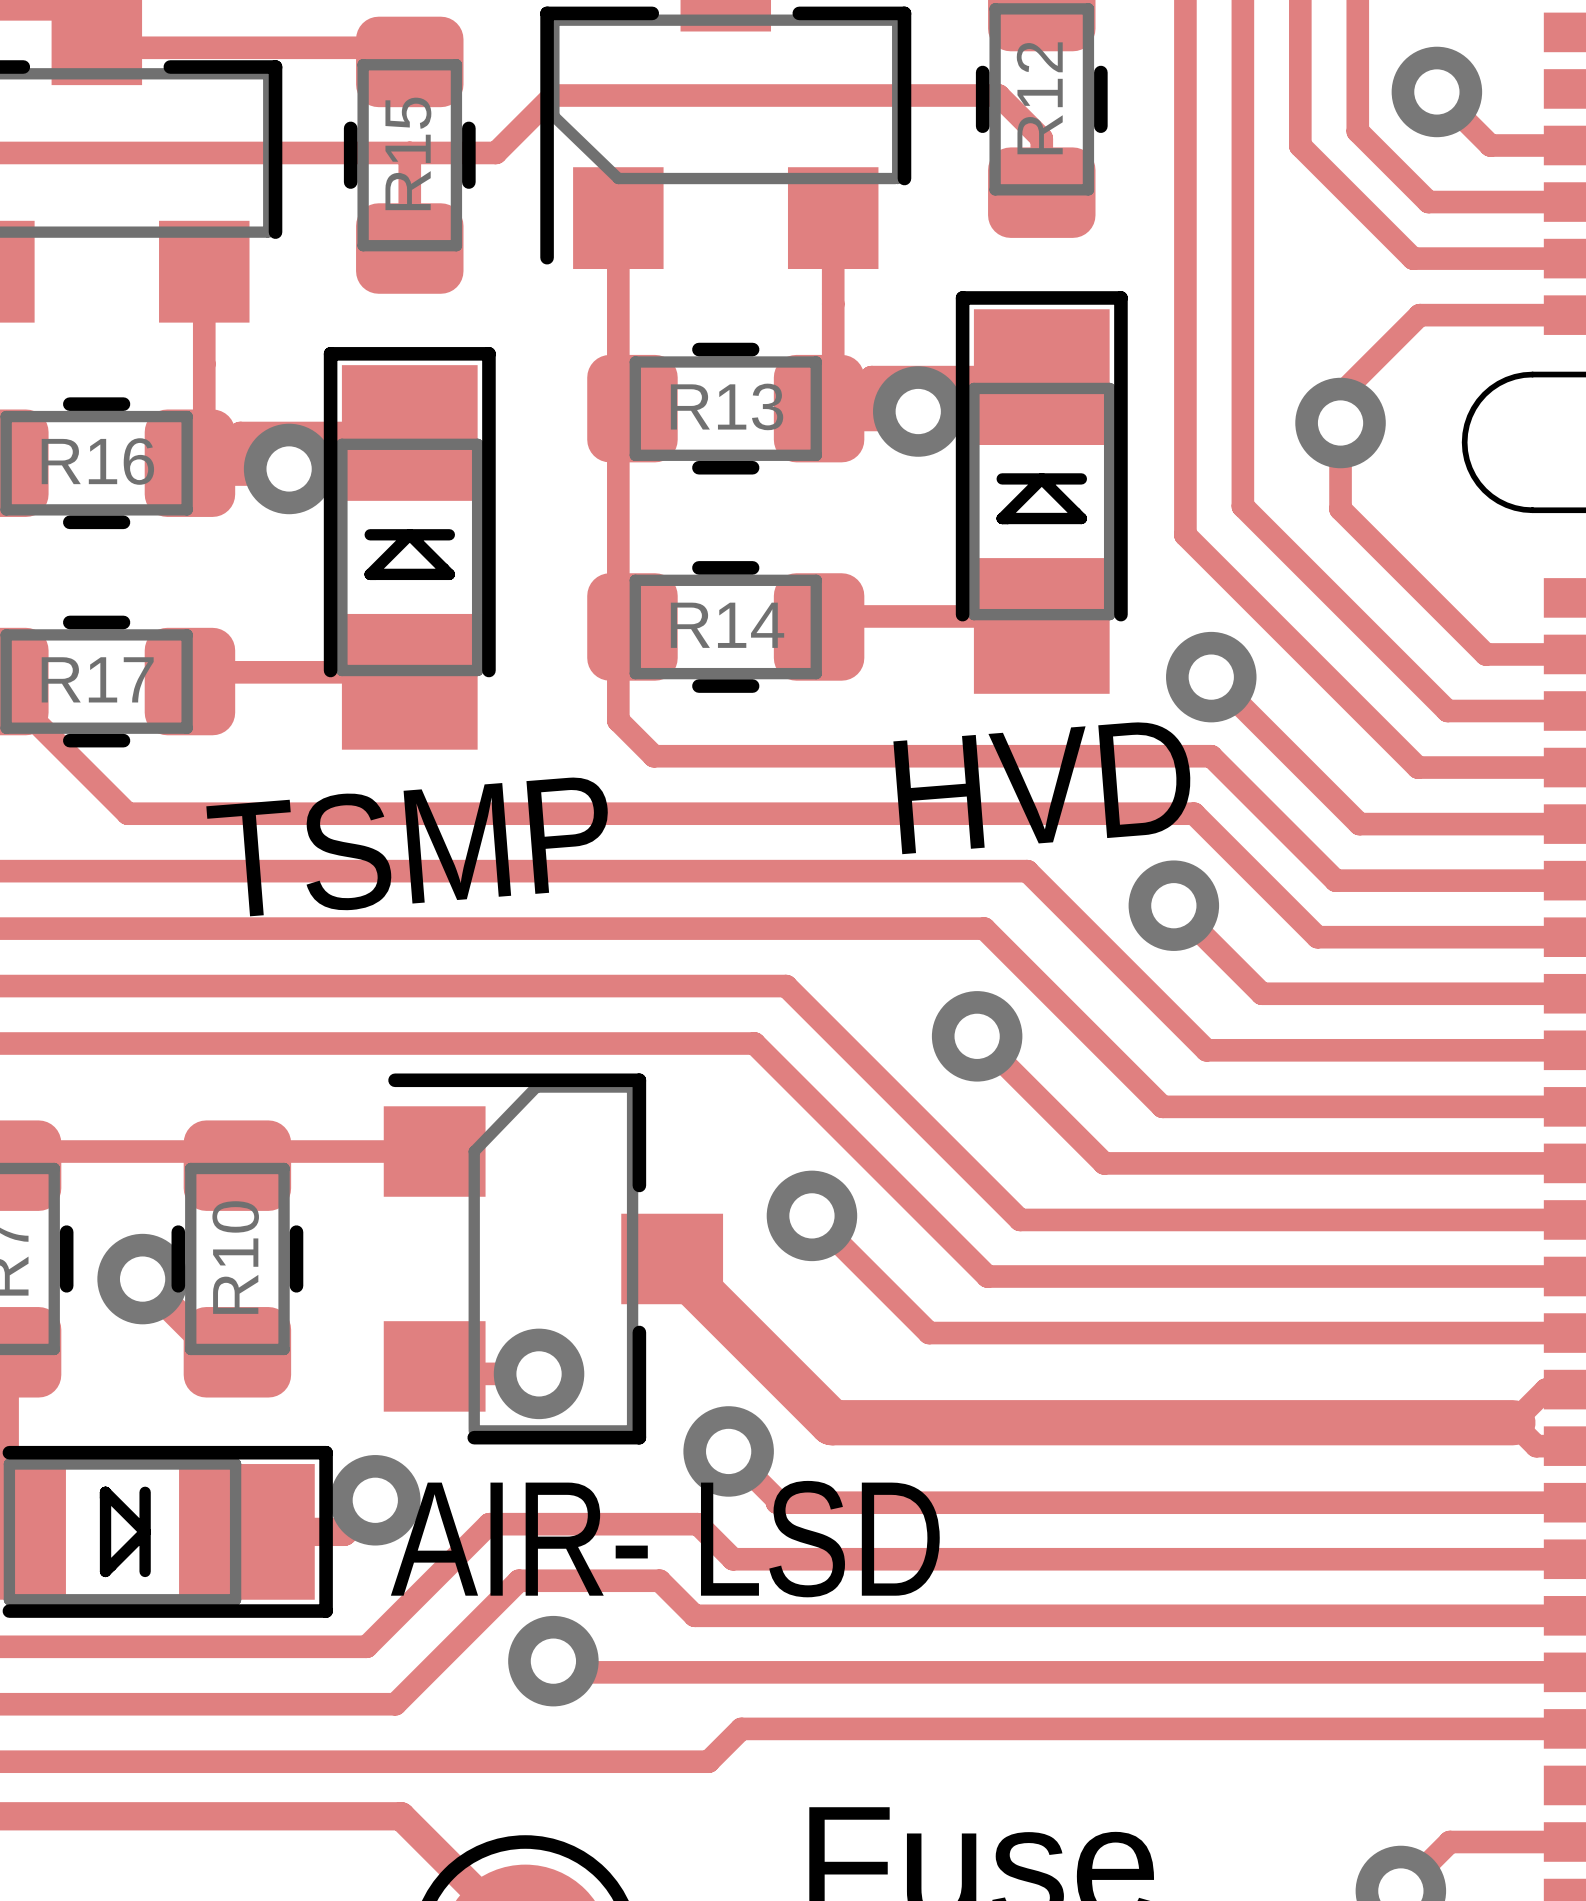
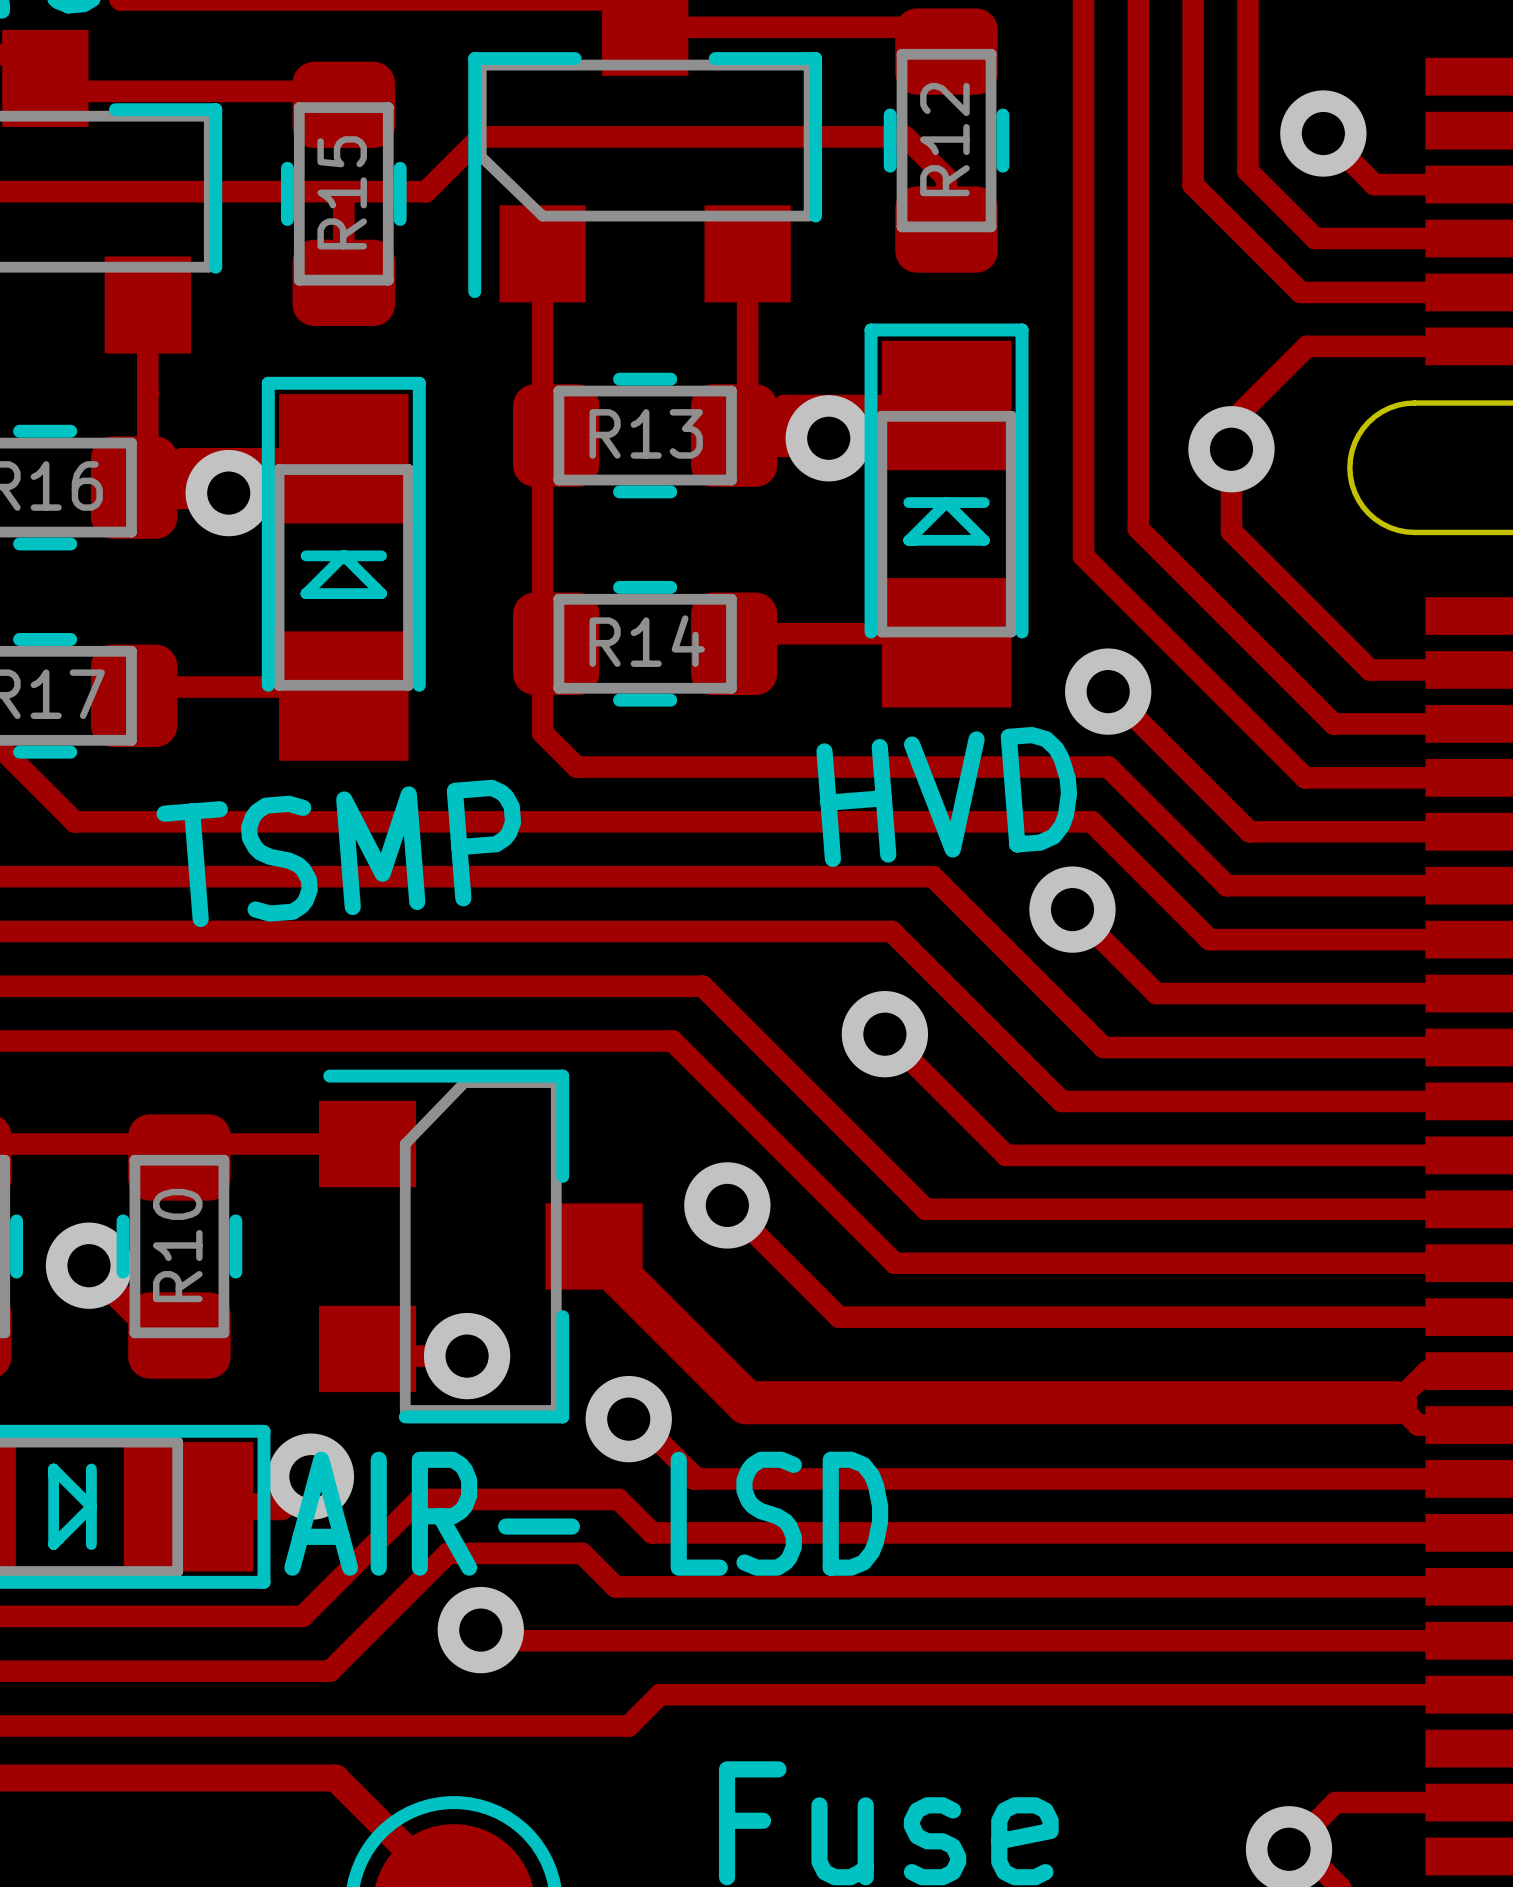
via position: (728, 1451) -> (628, 1419)

